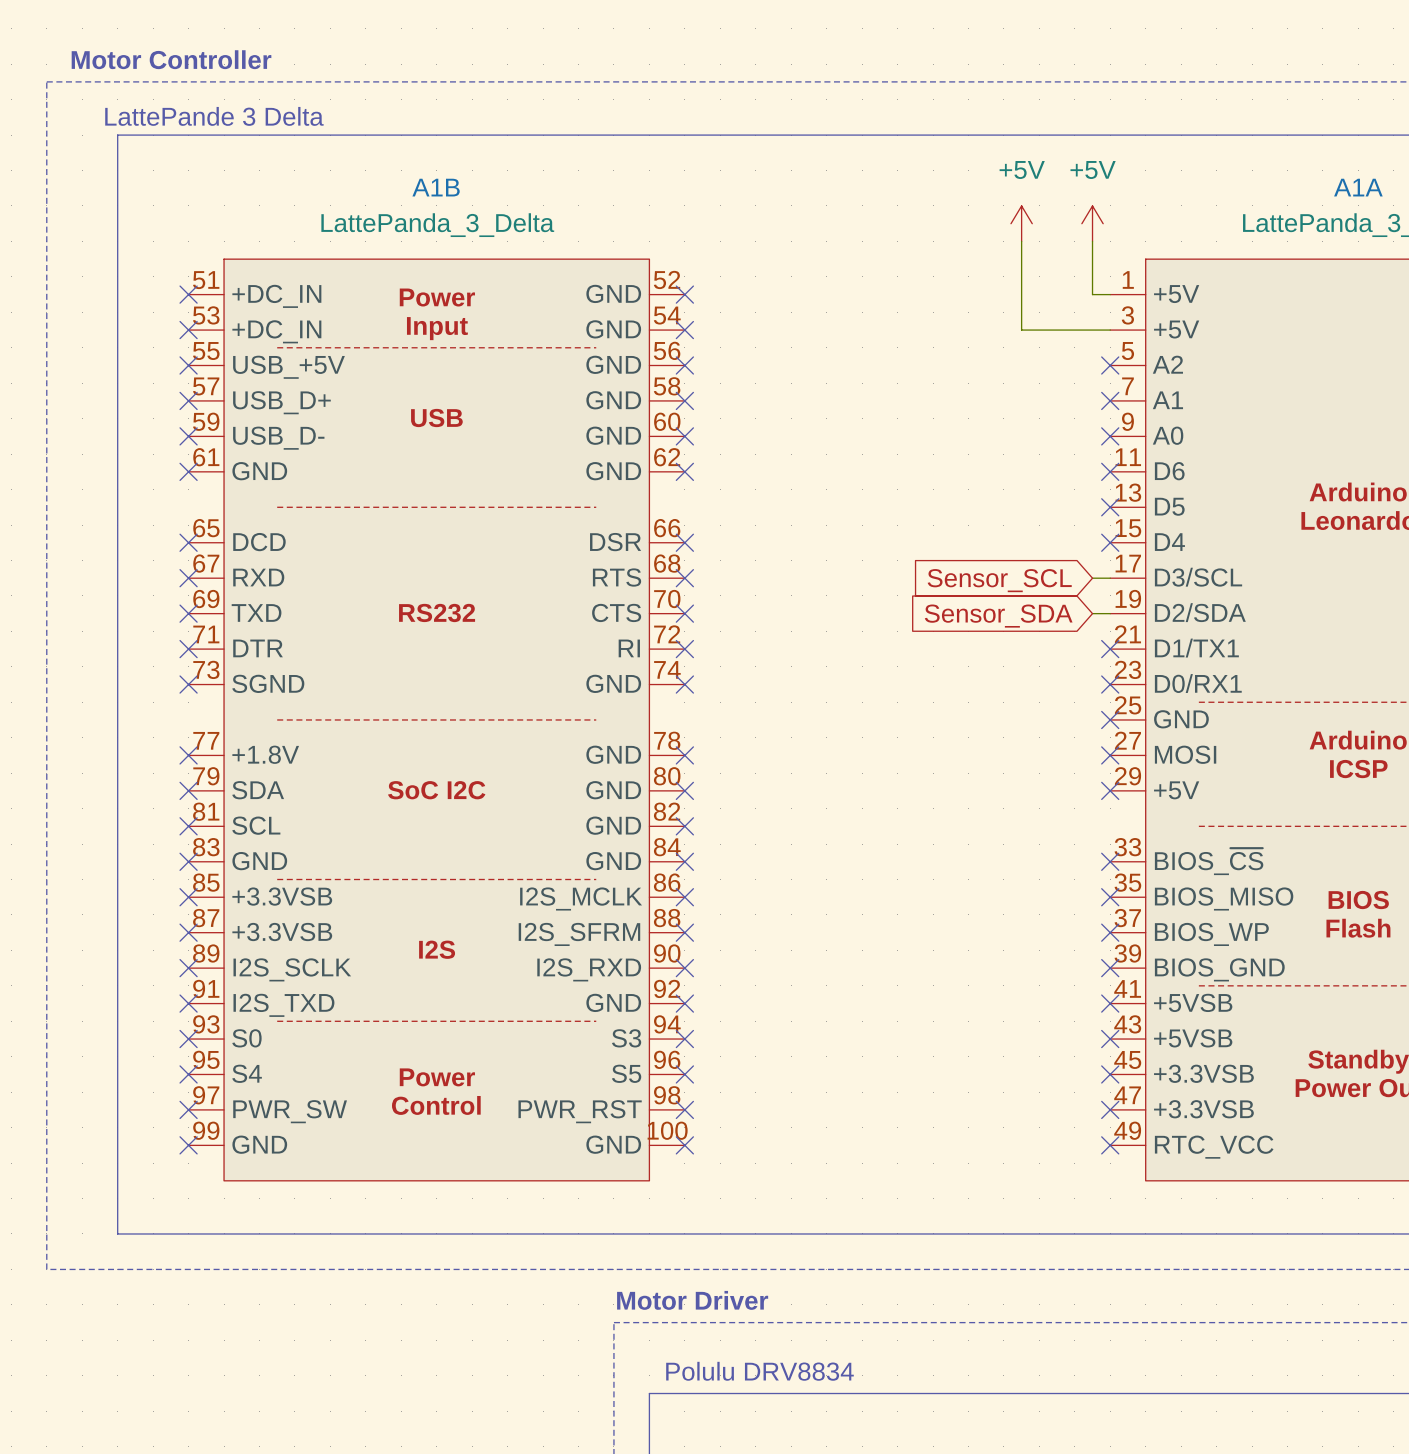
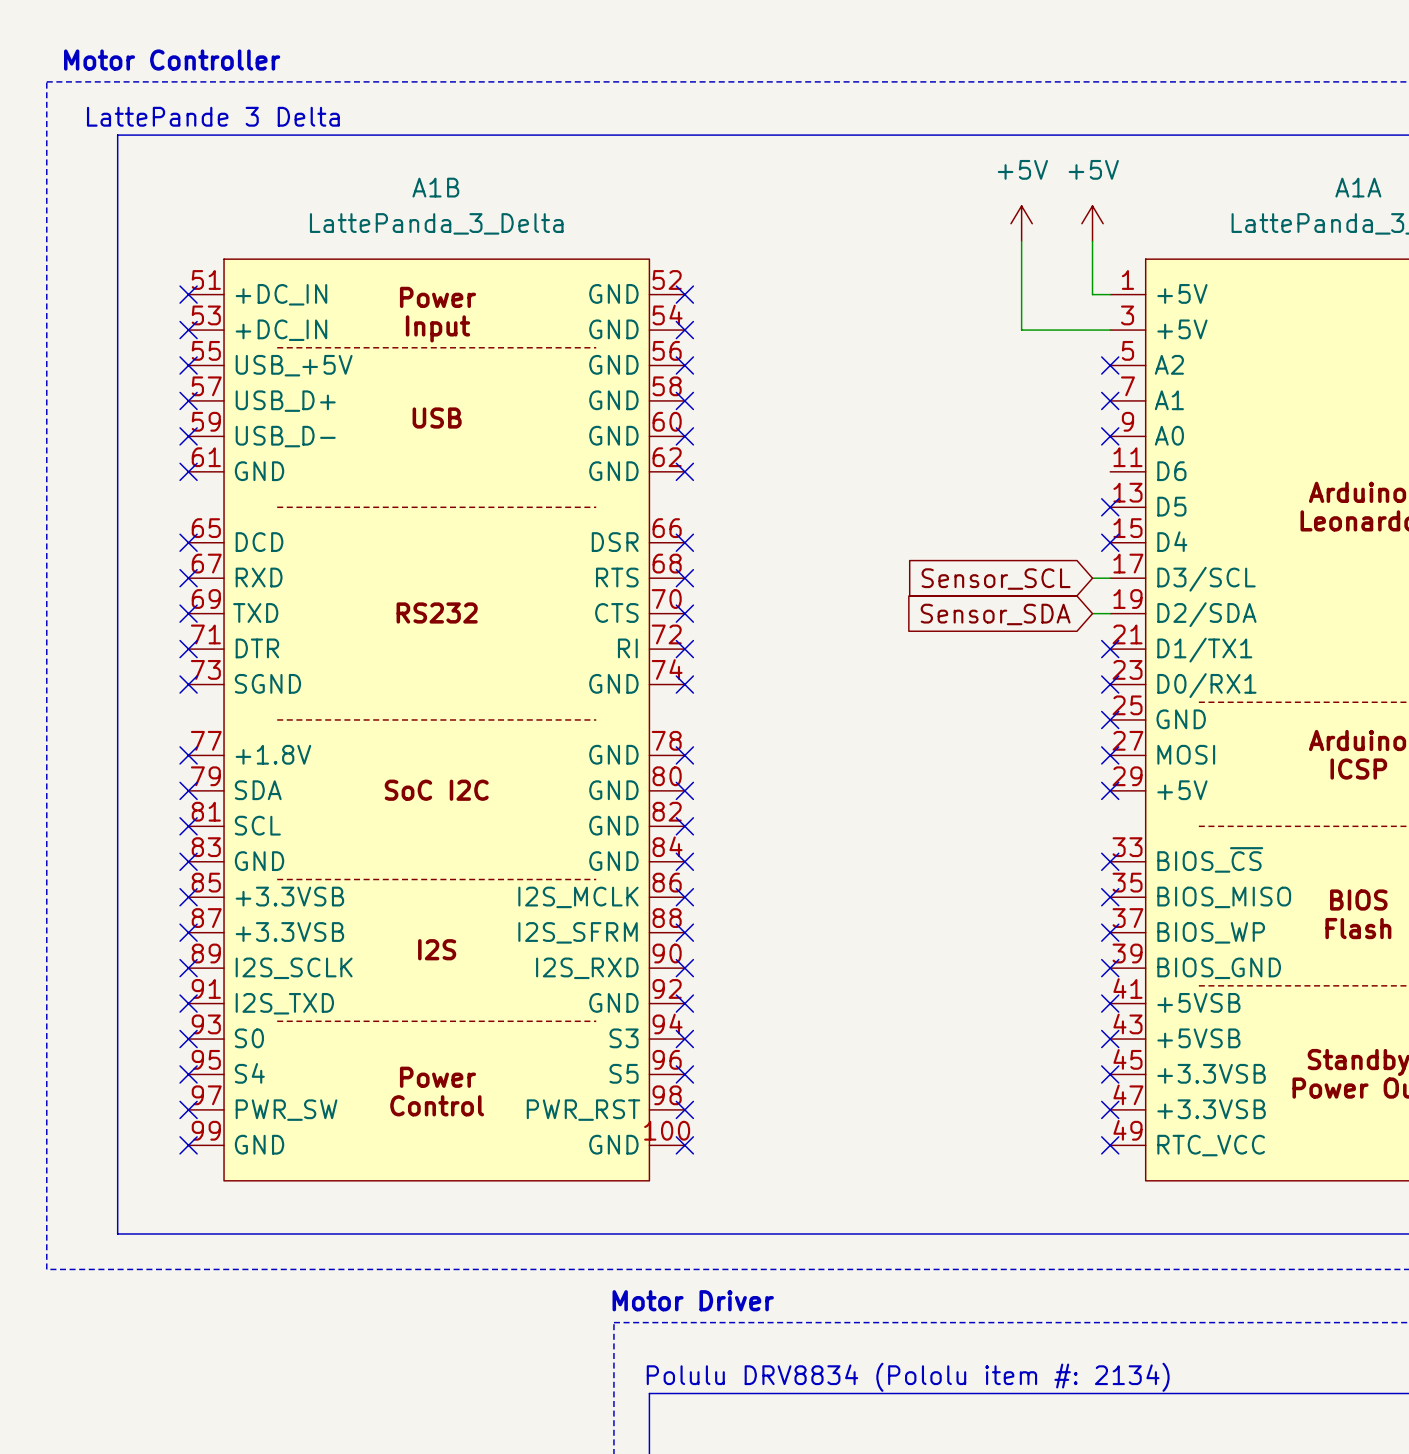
no-connect mark: (1110, 471) -> none
text: Polulu DRV8834 (759, 1371) -> none
text: none -> Polulu DRV8834 (Pololu item #: 2134) (908, 1377)

